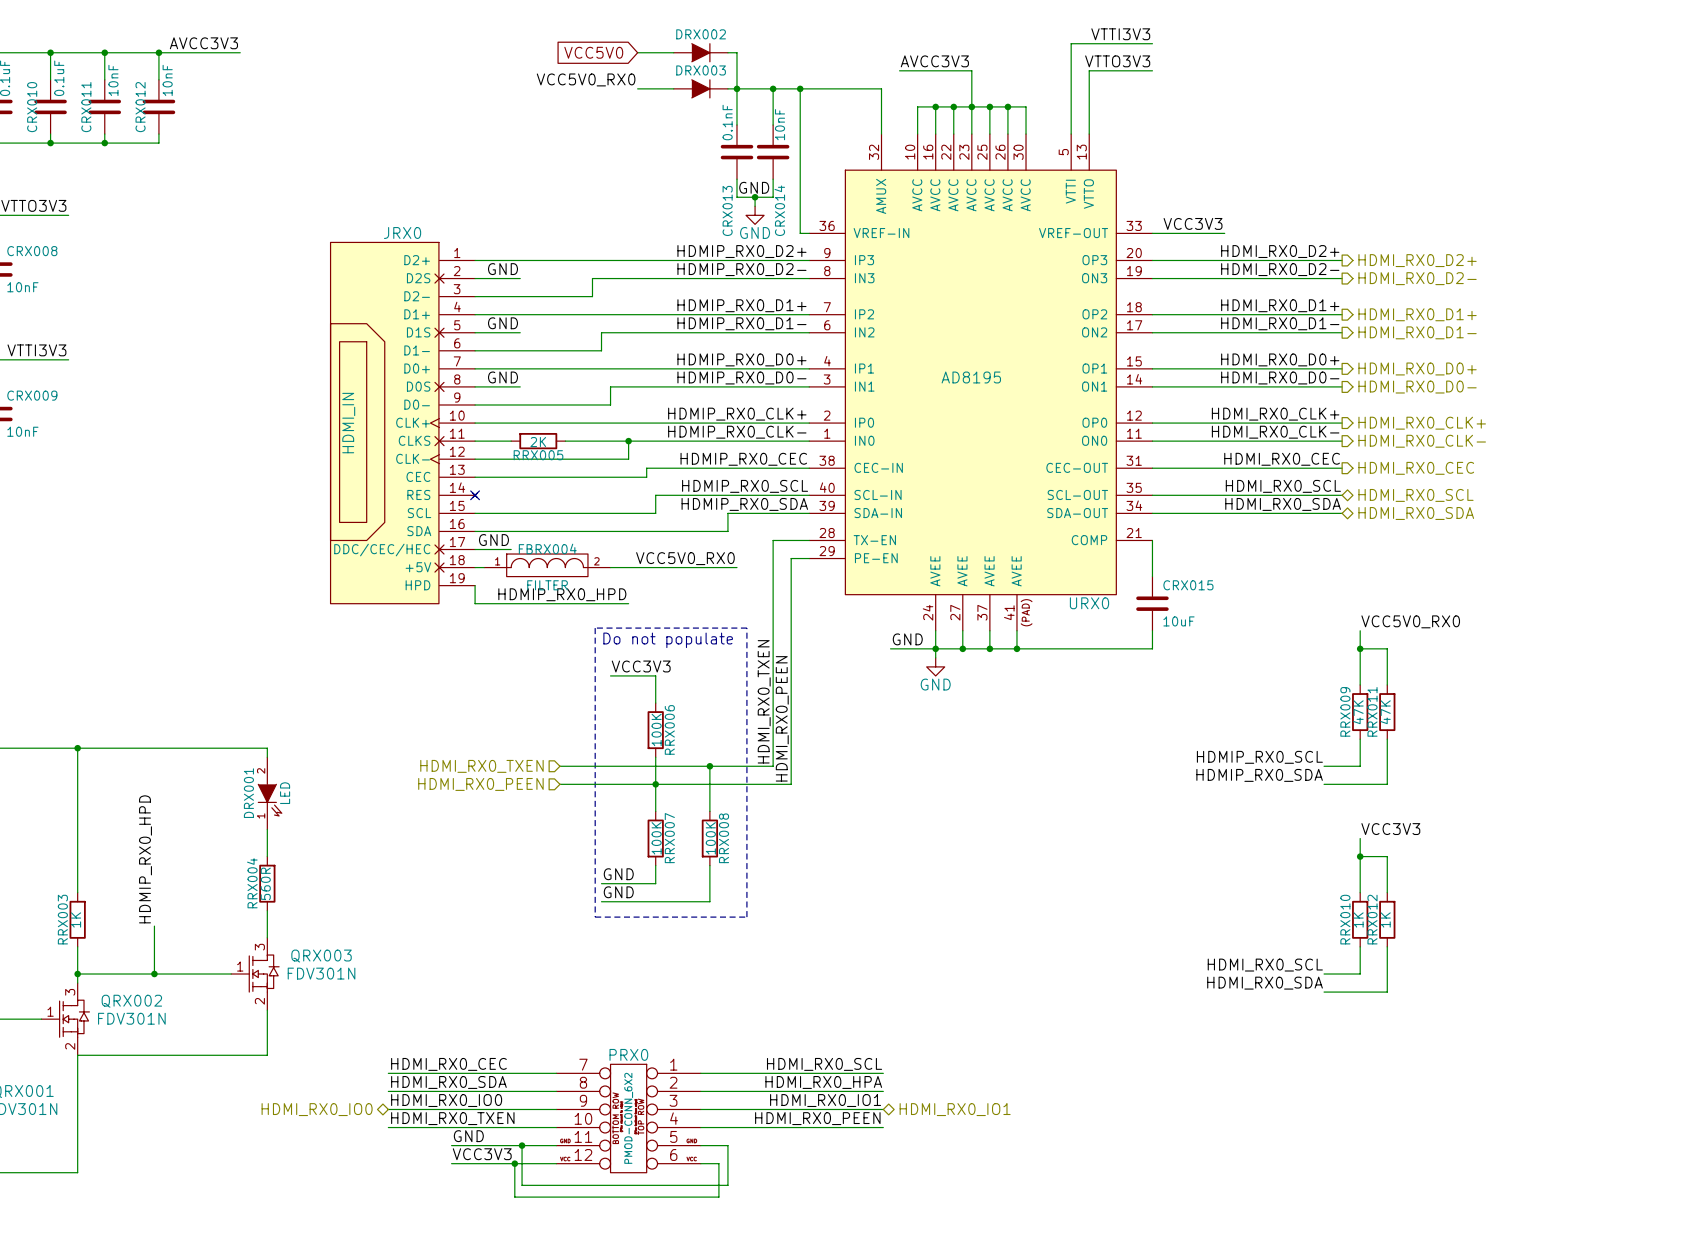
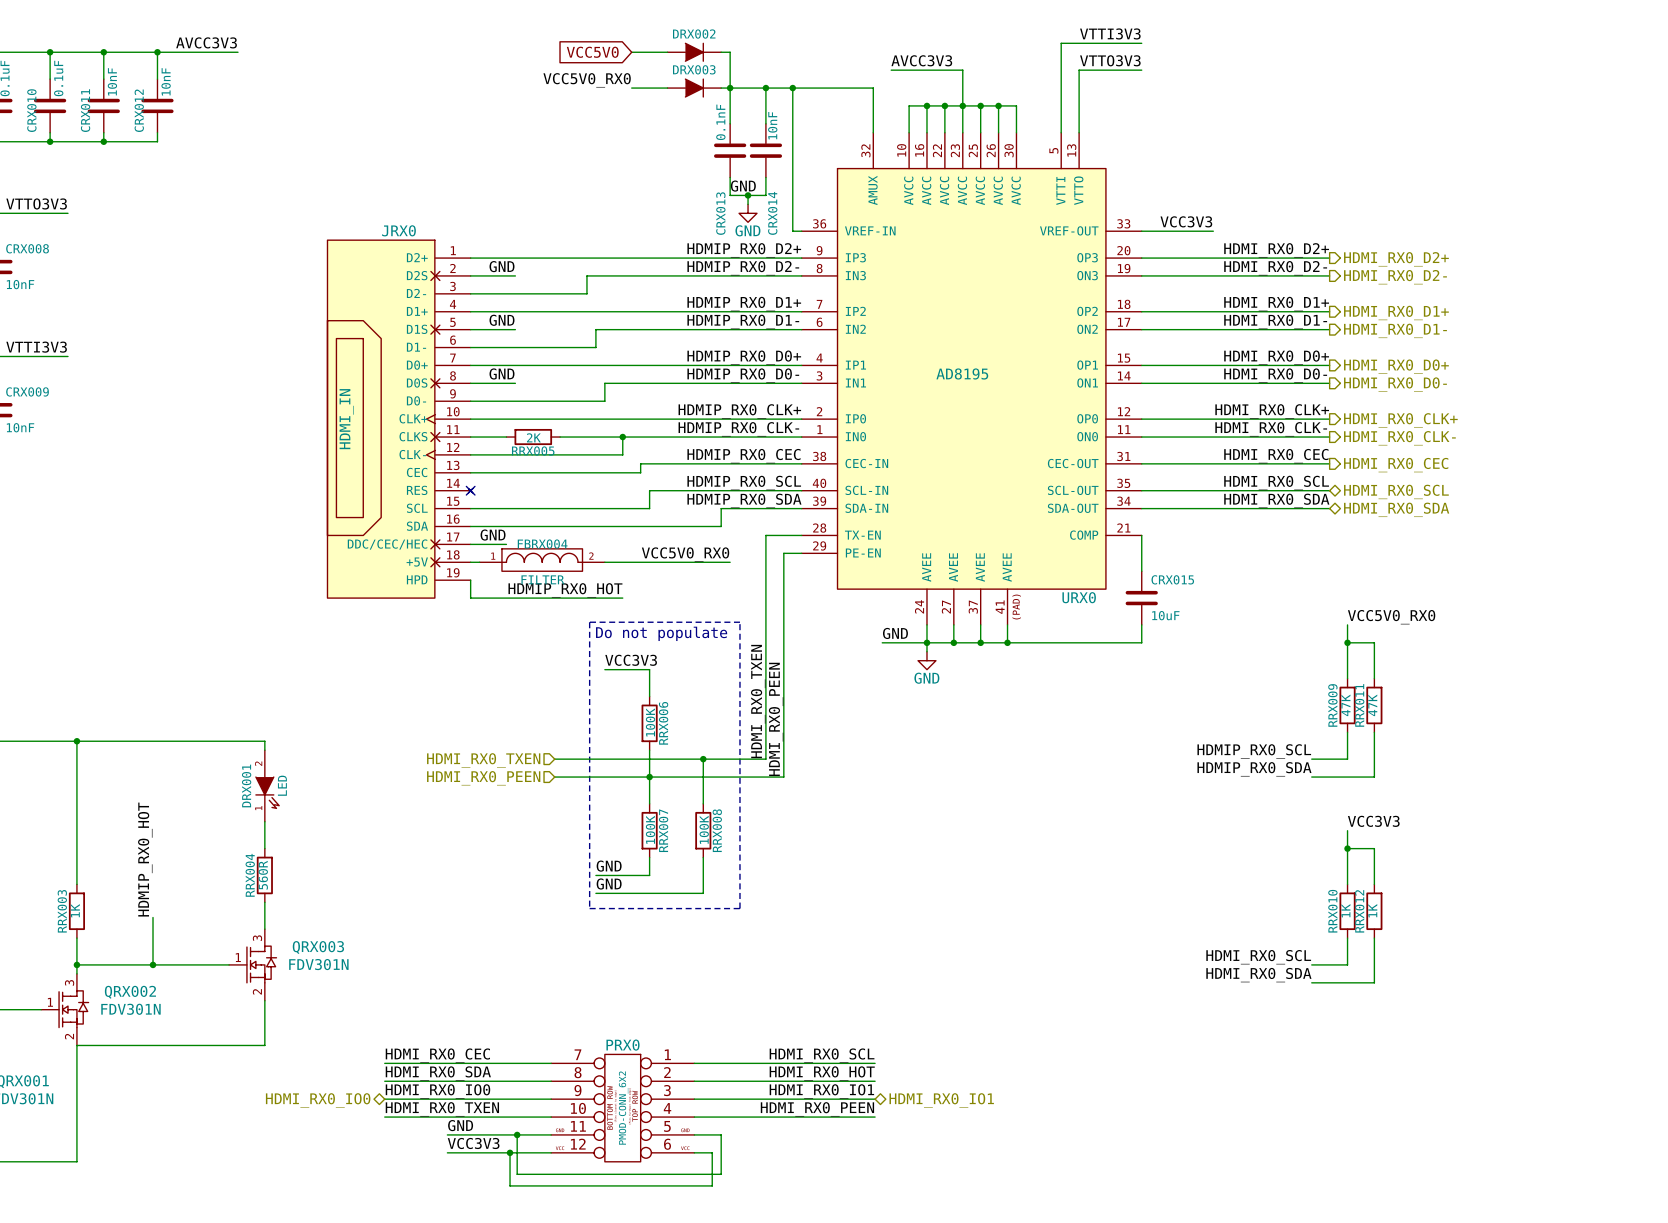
label: HDMIP_RX0_HPD (562, 594) -> HDMIP_RX0_HOT (565, 590)
label: HDMIP_RX0_HPD (145, 859) -> HDMIP_RX0_HOT (145, 859)
label: HDMI_RX0_HPA (823, 1082) -> HDMI_RX0_HOT (822, 1073)

